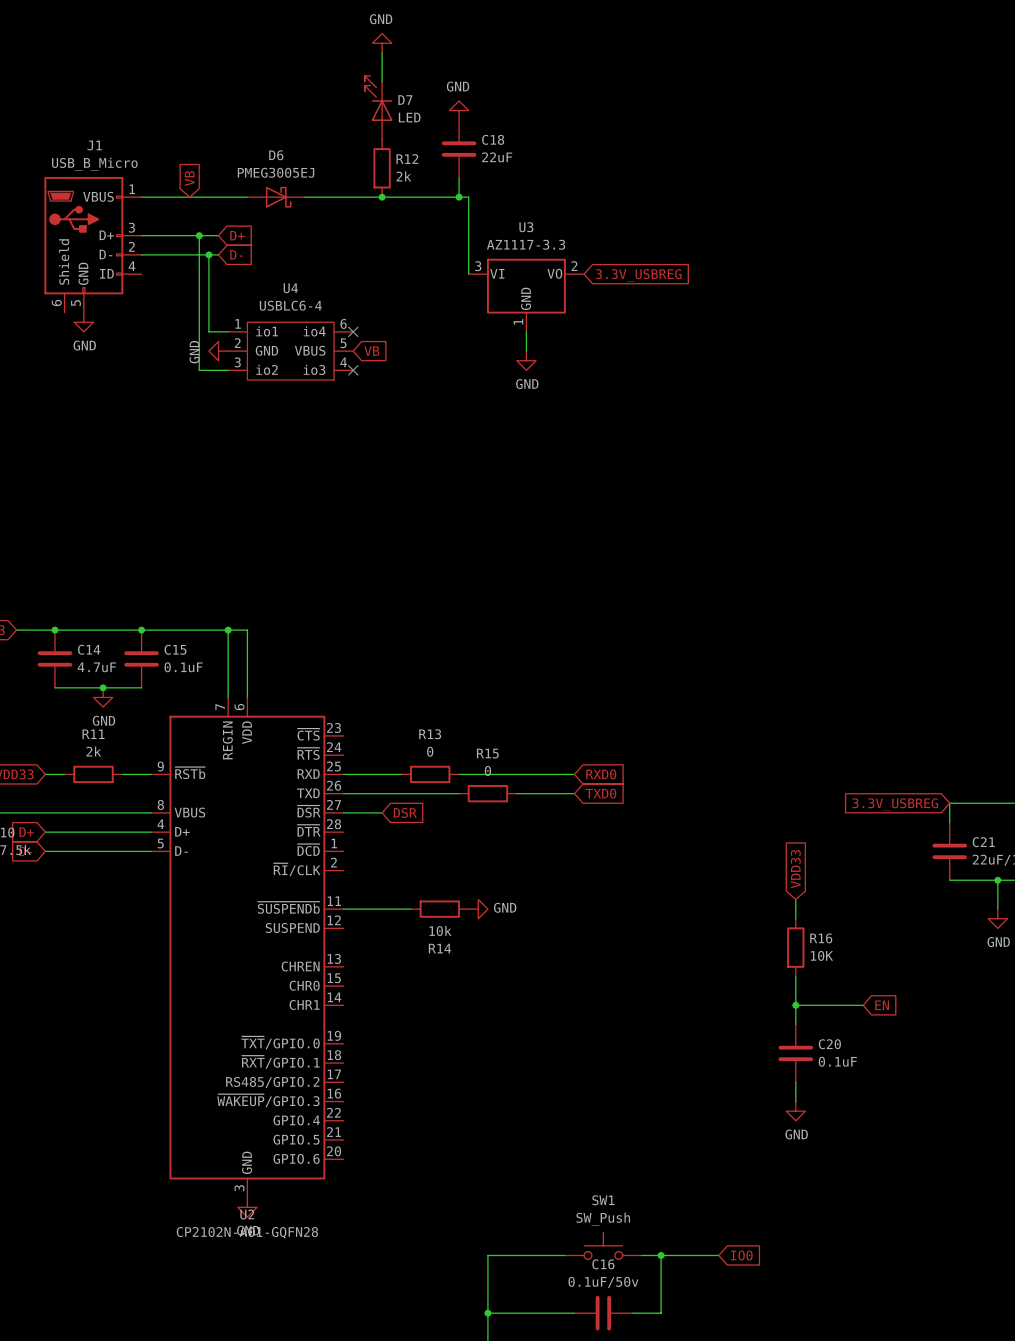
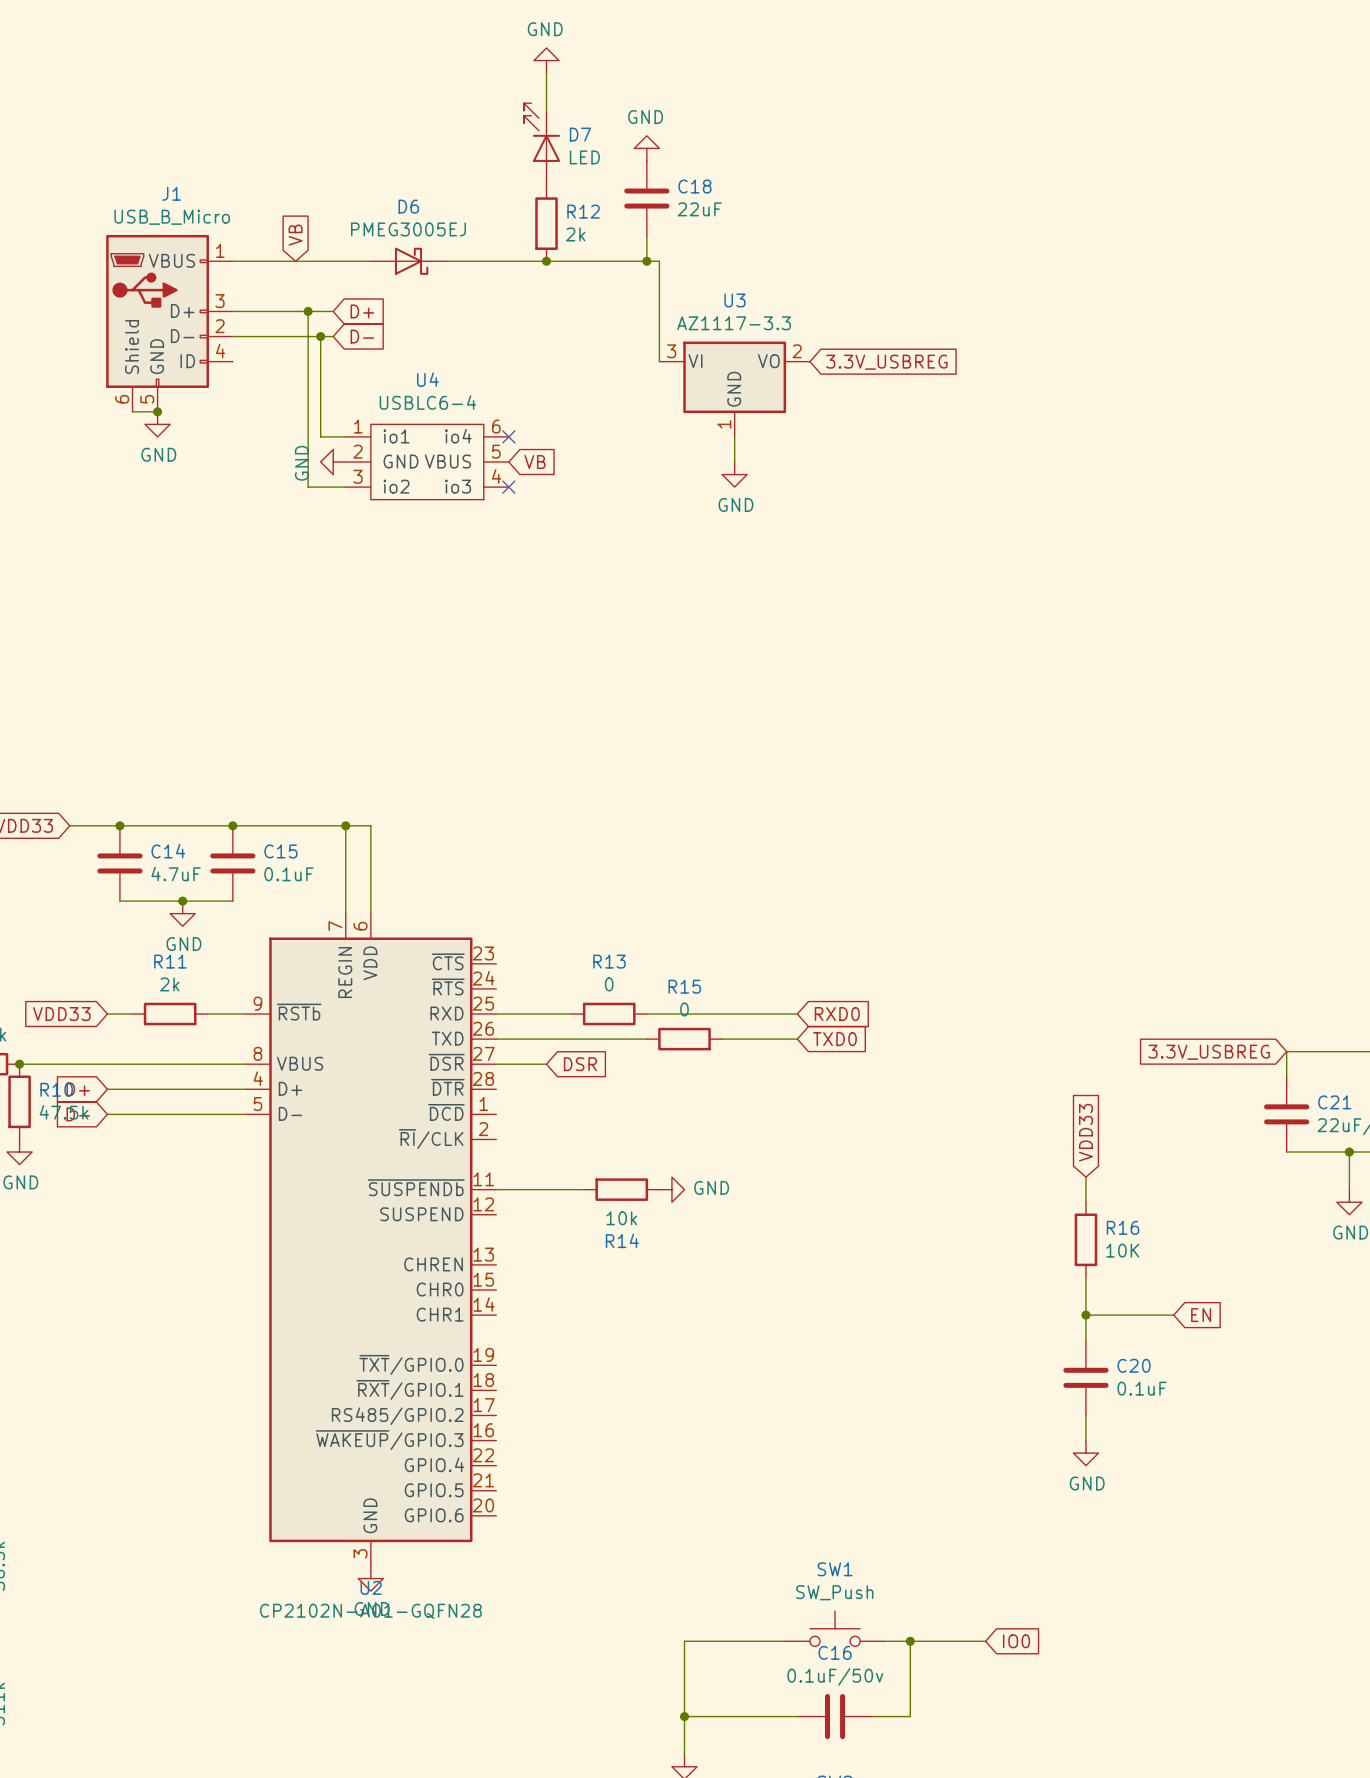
wire: none -> (132, 411) (157, 411)
junction: none -> (157, 411)

